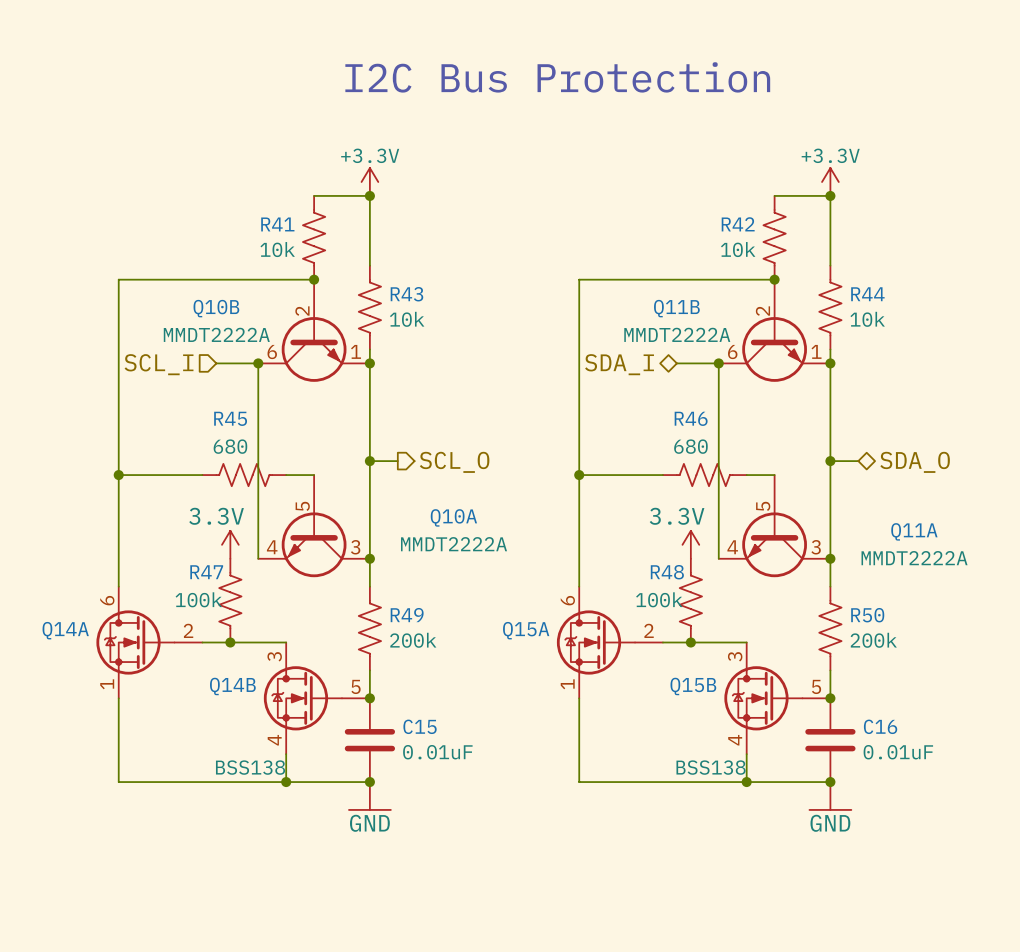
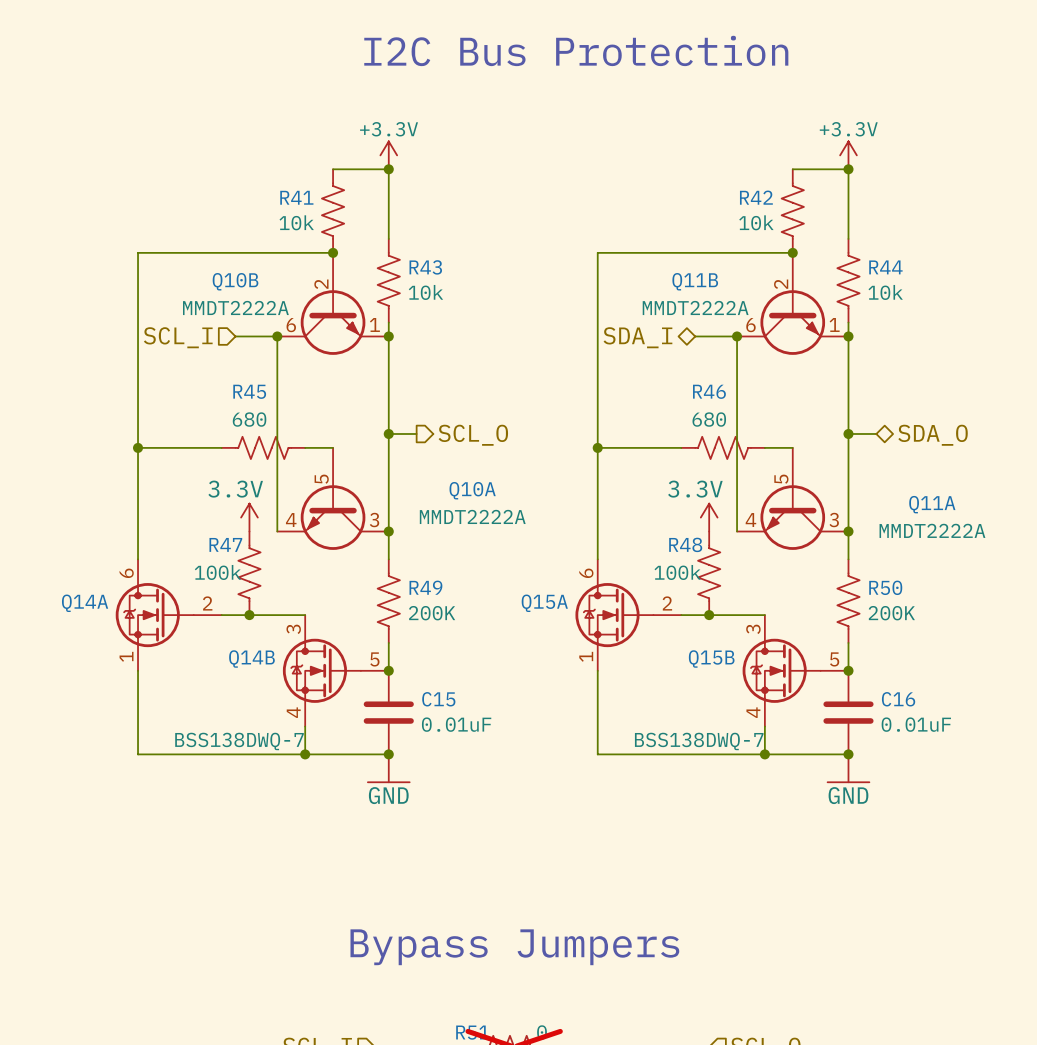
R49 value: 200k (413, 640) -> 200K (432, 613)
R50 value: 200k (873, 640) -> 200K (891, 613)
Q14A value: BSS138 (250, 767) -> BSS138DWQ-7 (239, 741)
Q15A value: BSS138 (711, 767) -> BSS138DWQ-7 (699, 741)

